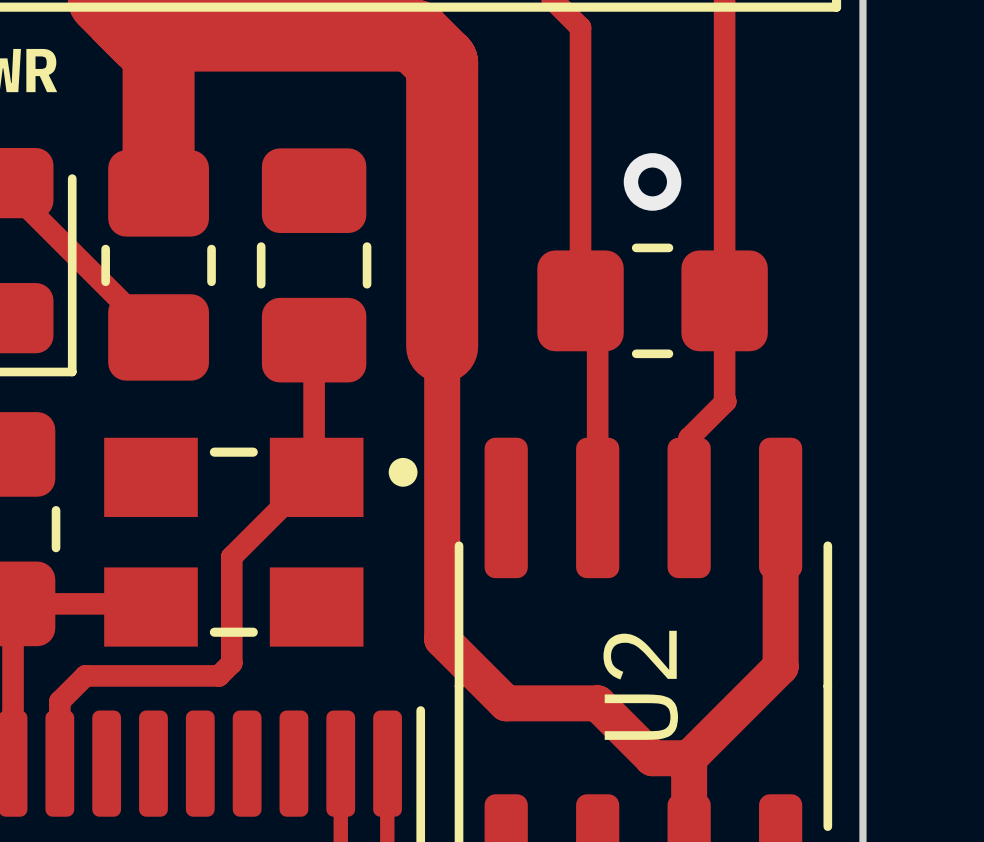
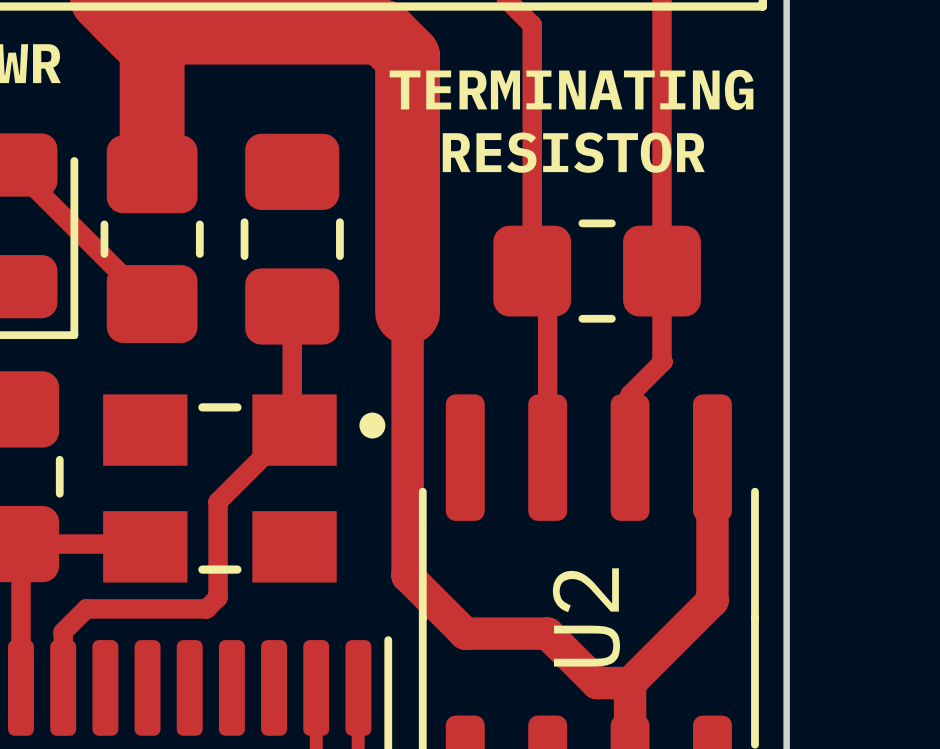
text: none -> TERMINATING (571, 89)
text: none -> RESISTOR (573, 152)
via: (652, 181) -> none

